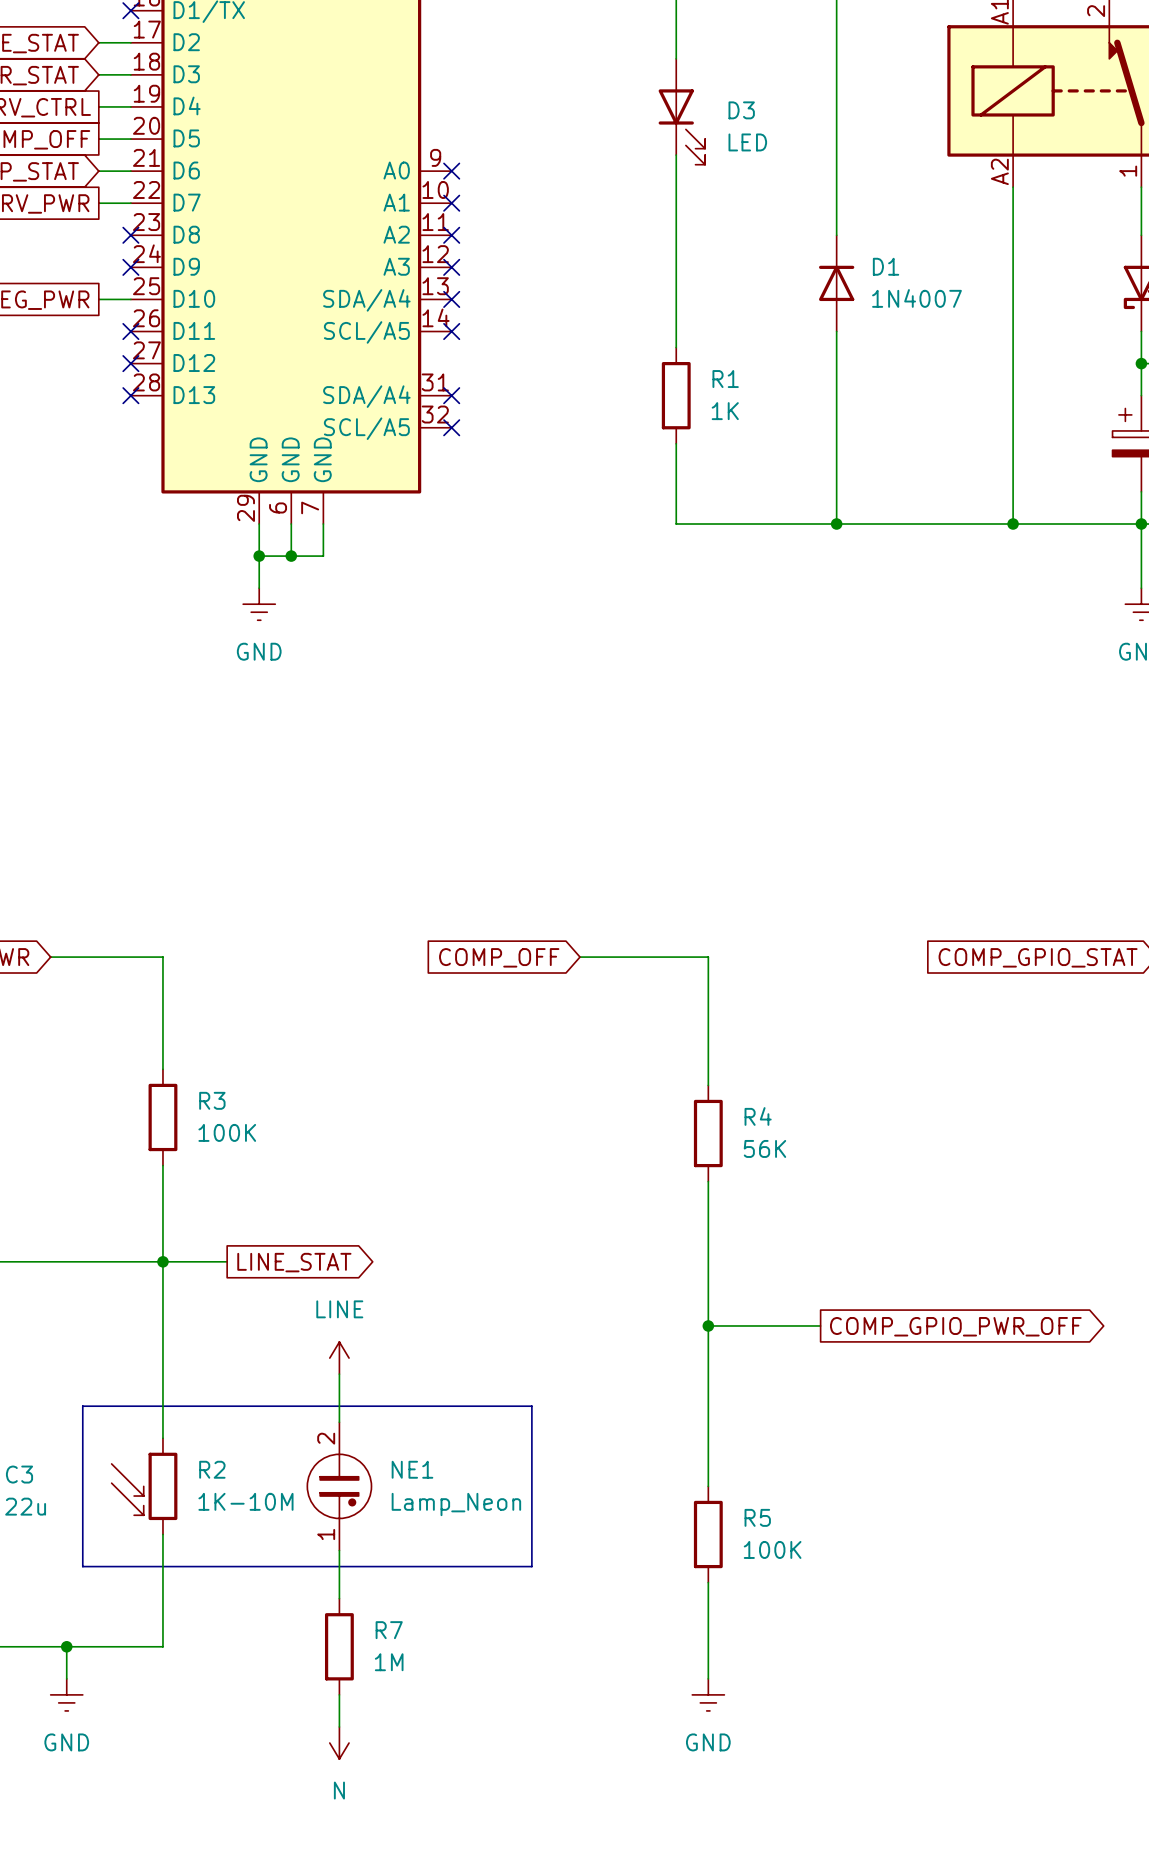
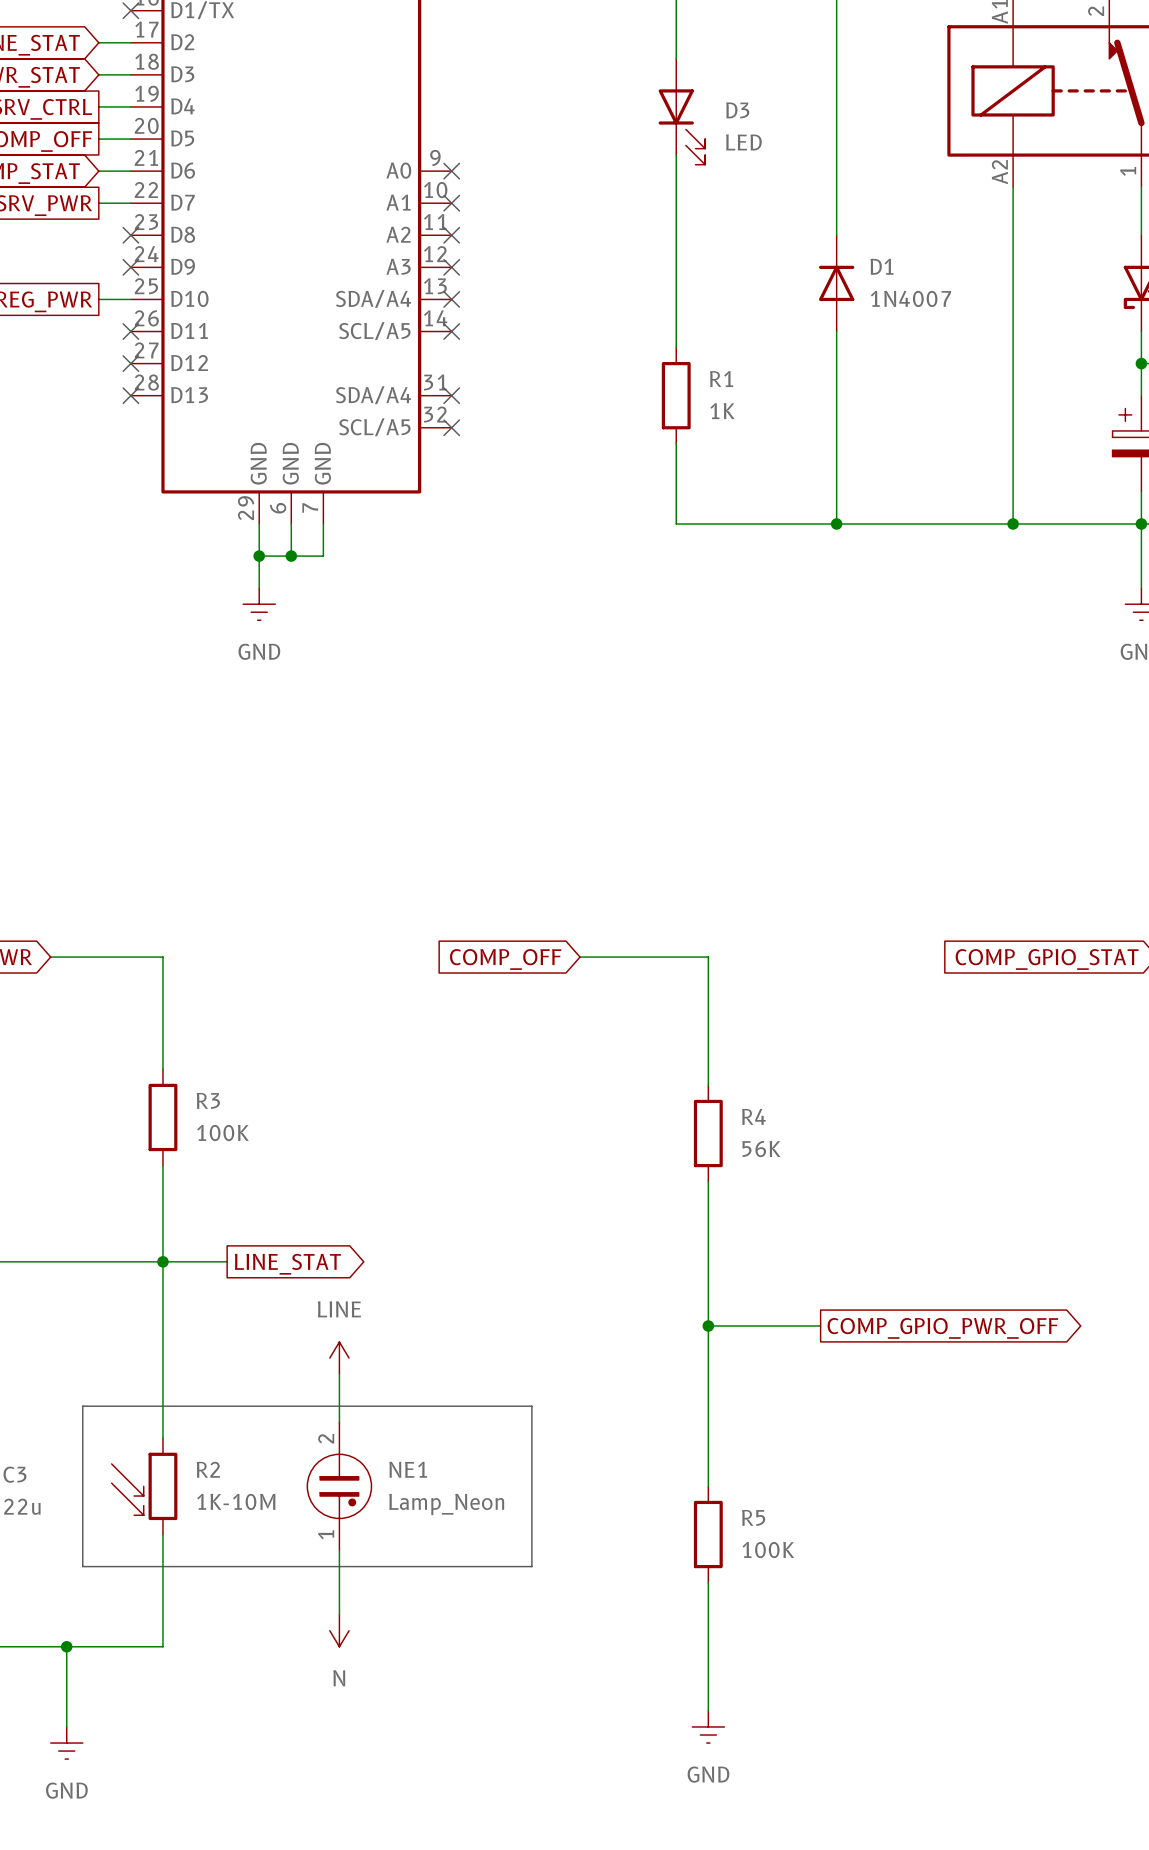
R7: 1M (339, 1646) -> none
wire: none -> (66, 1678) (66, 1726)
power symbol position: GND (66, 1694) -> GND (66, 1743)
wire: (339, 1694) (339, 1726) -> none
power symbol position: GND (708, 1694) -> GND (708, 1726)
power symbol position: N (339, 1743) -> N (339, 1630)

